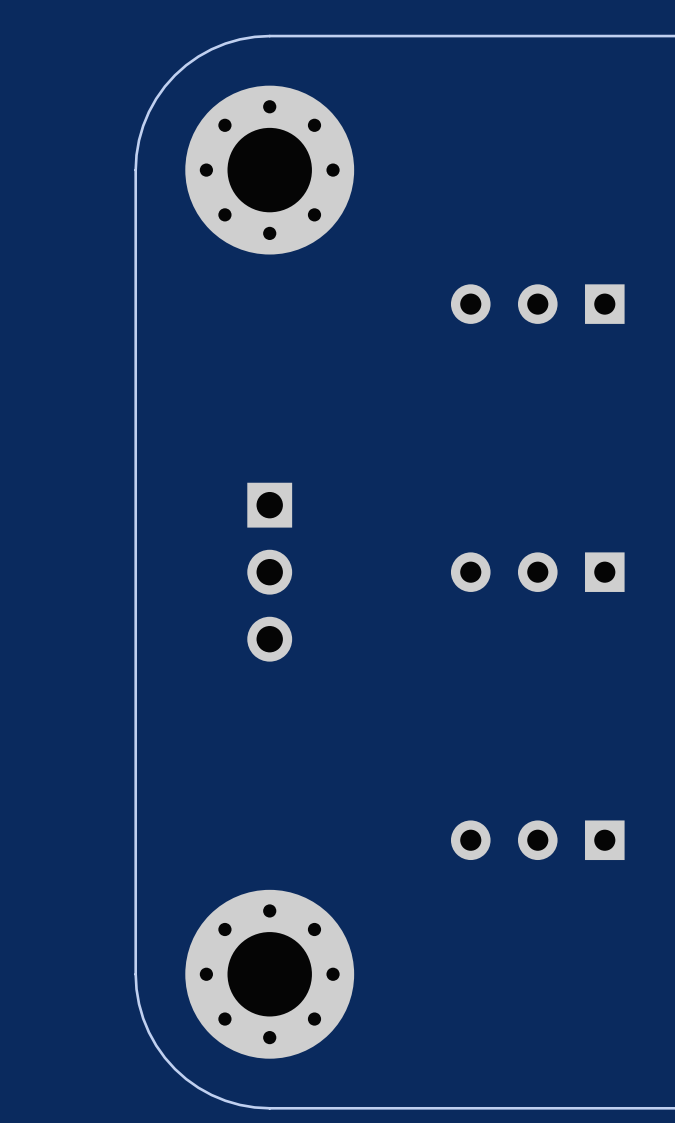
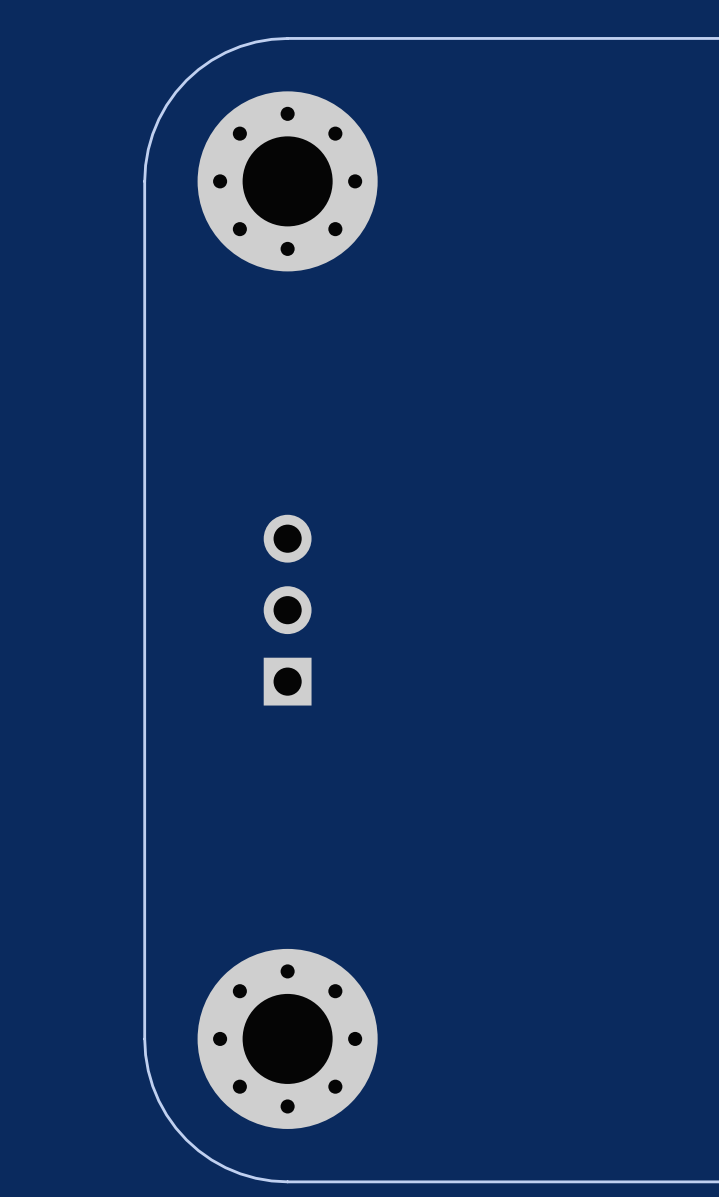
part: (537, 304) -> none
part rotation: 0° (269, 572) -> 180° (287, 610)
part: (537, 572) -> none
part: (537, 840) -> none

